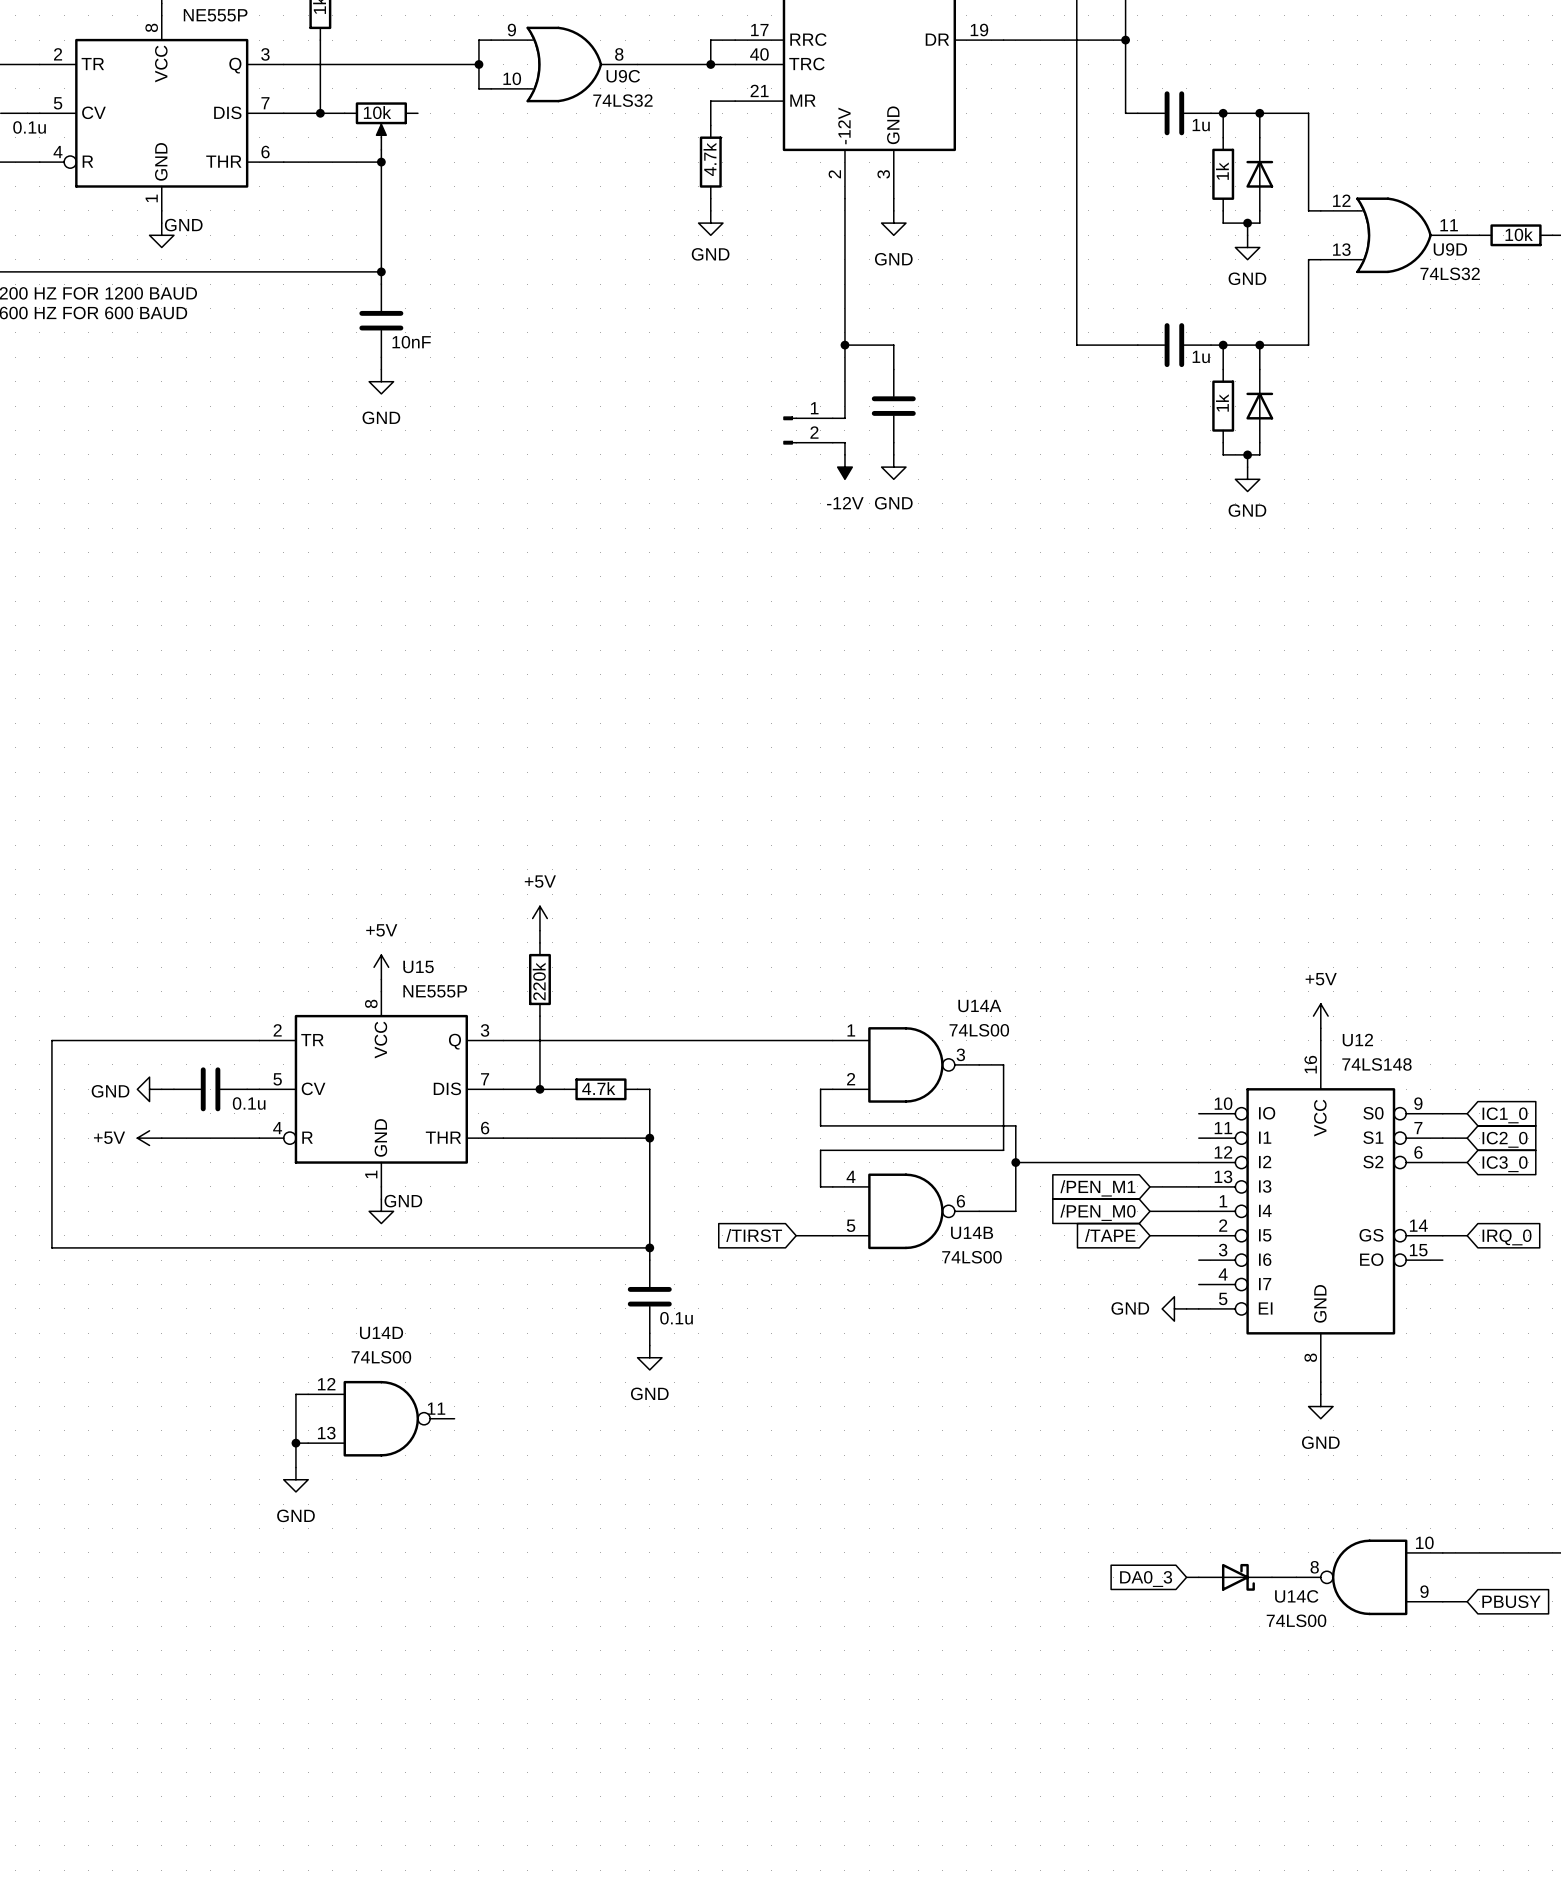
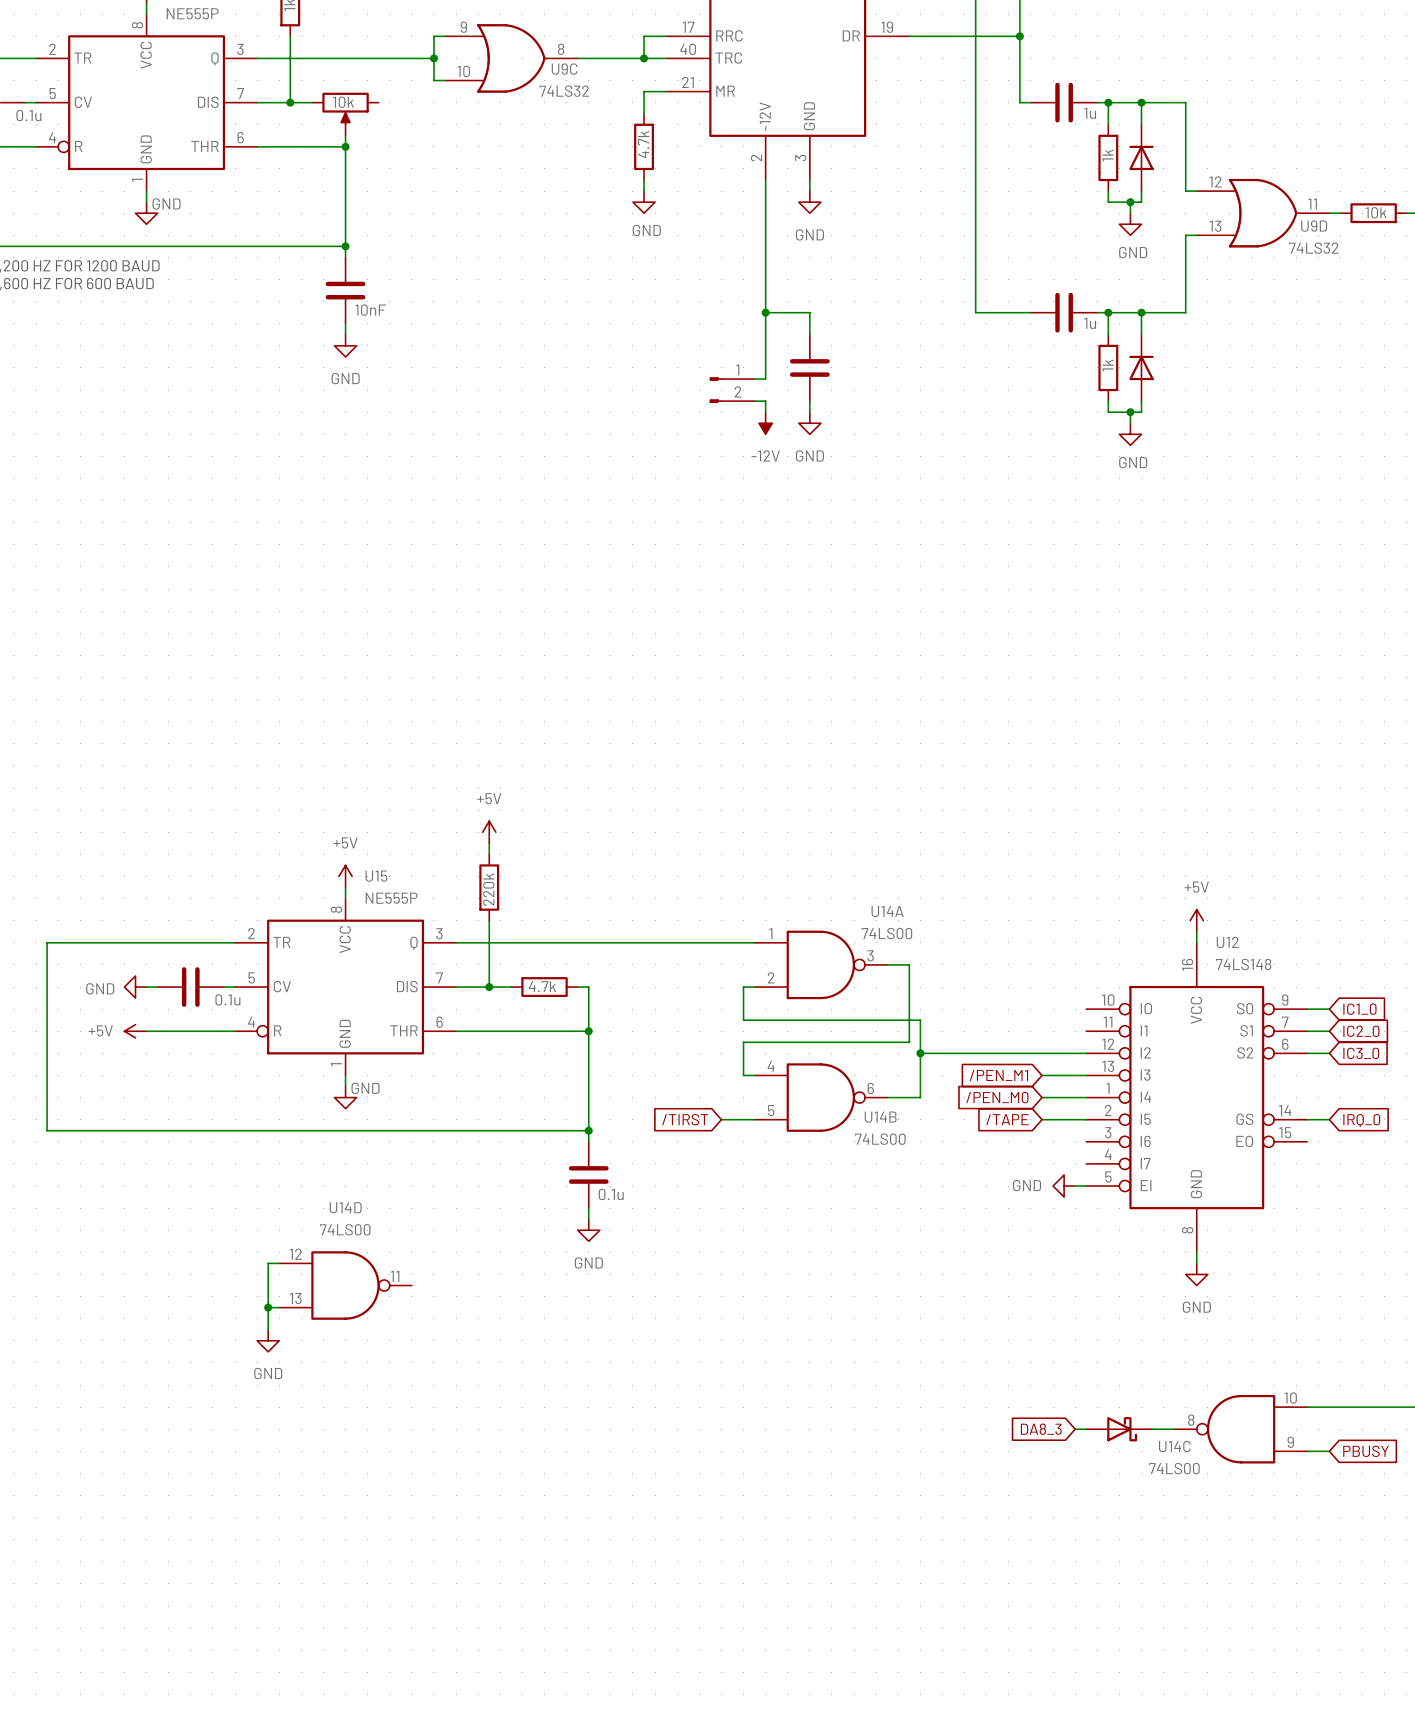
global label: DA0_3 (1146, 1579) -> DA8_3 (1041, 1429)

